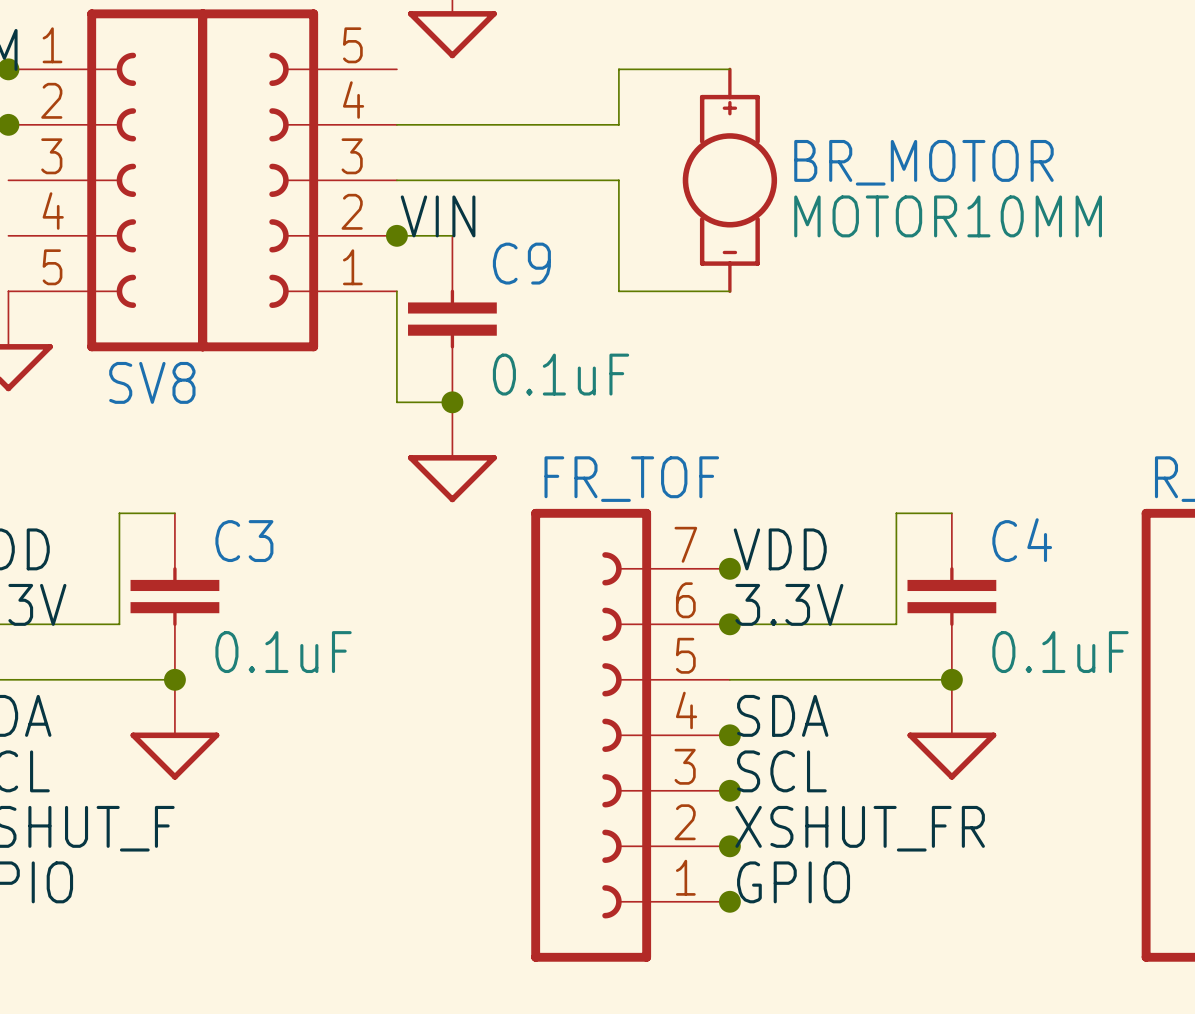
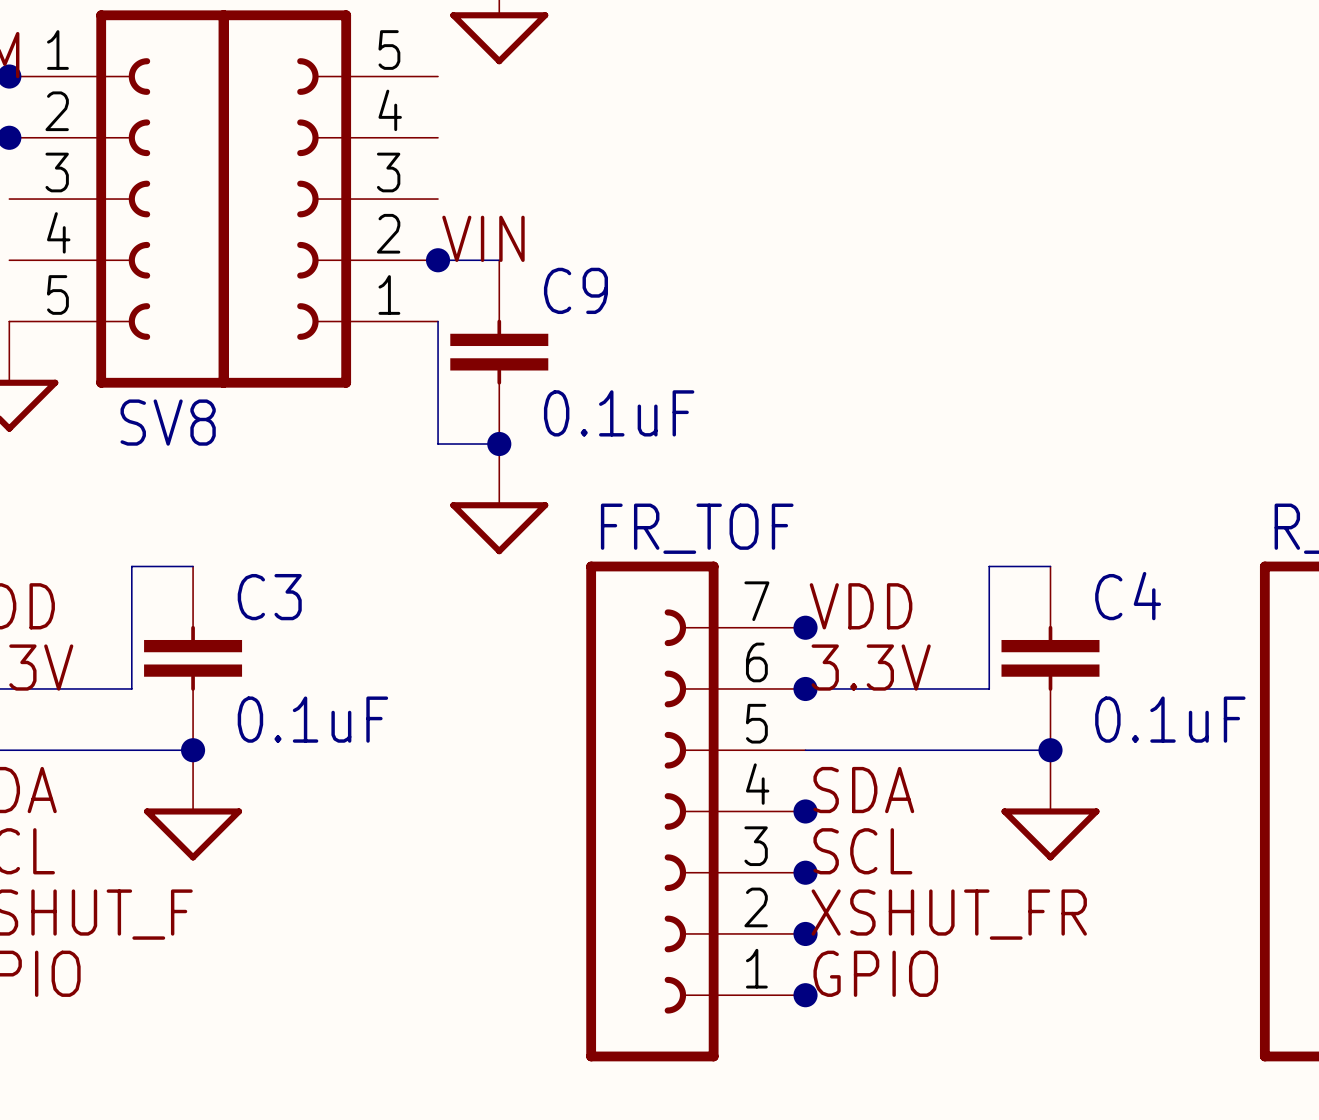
wire: (729, 69) (618, 69) (618, 124) (396, 124) -> none
wire: (396, 180) (618, 180) (618, 291) (729, 291) -> none
BR_MOTOR: MOTOR10MM (729, 180) -> none

